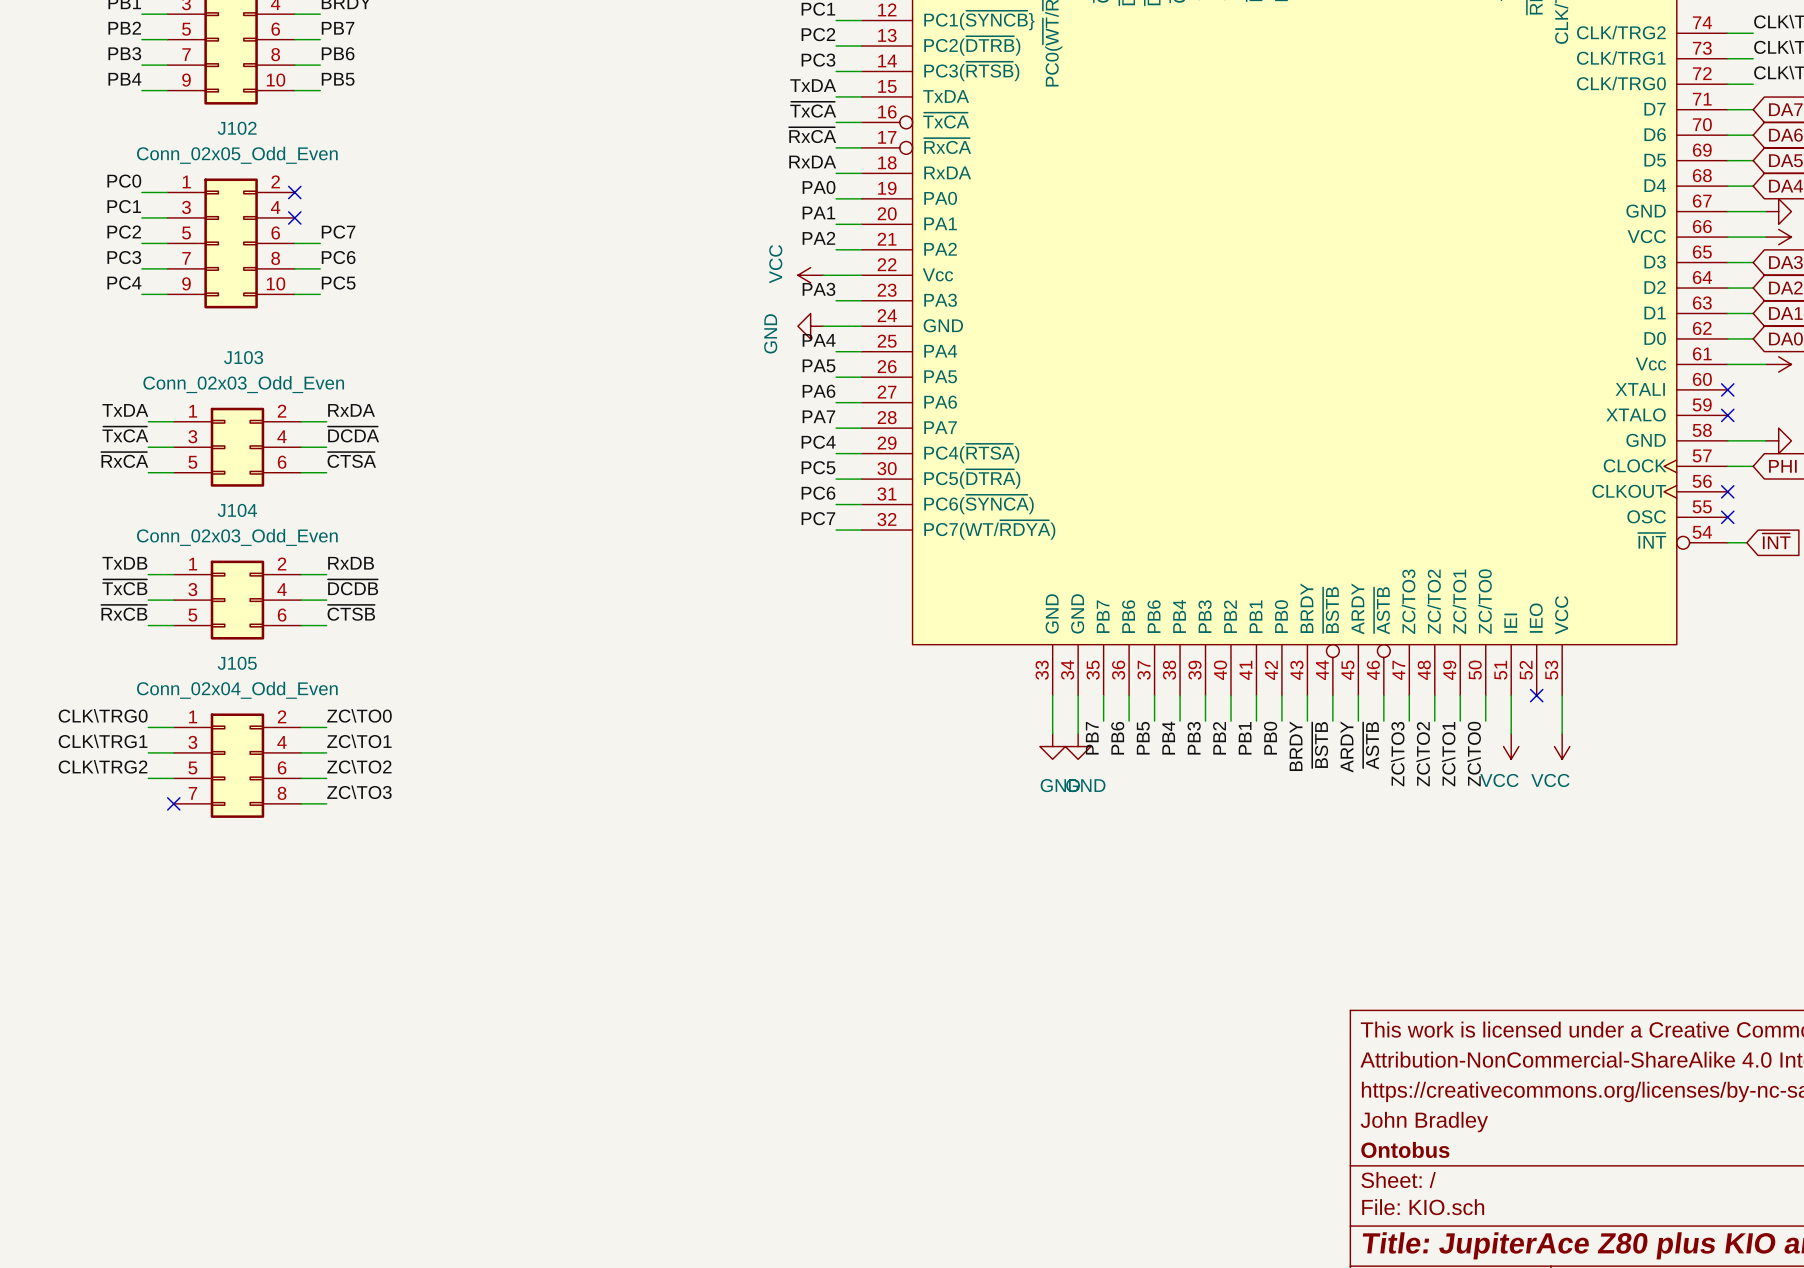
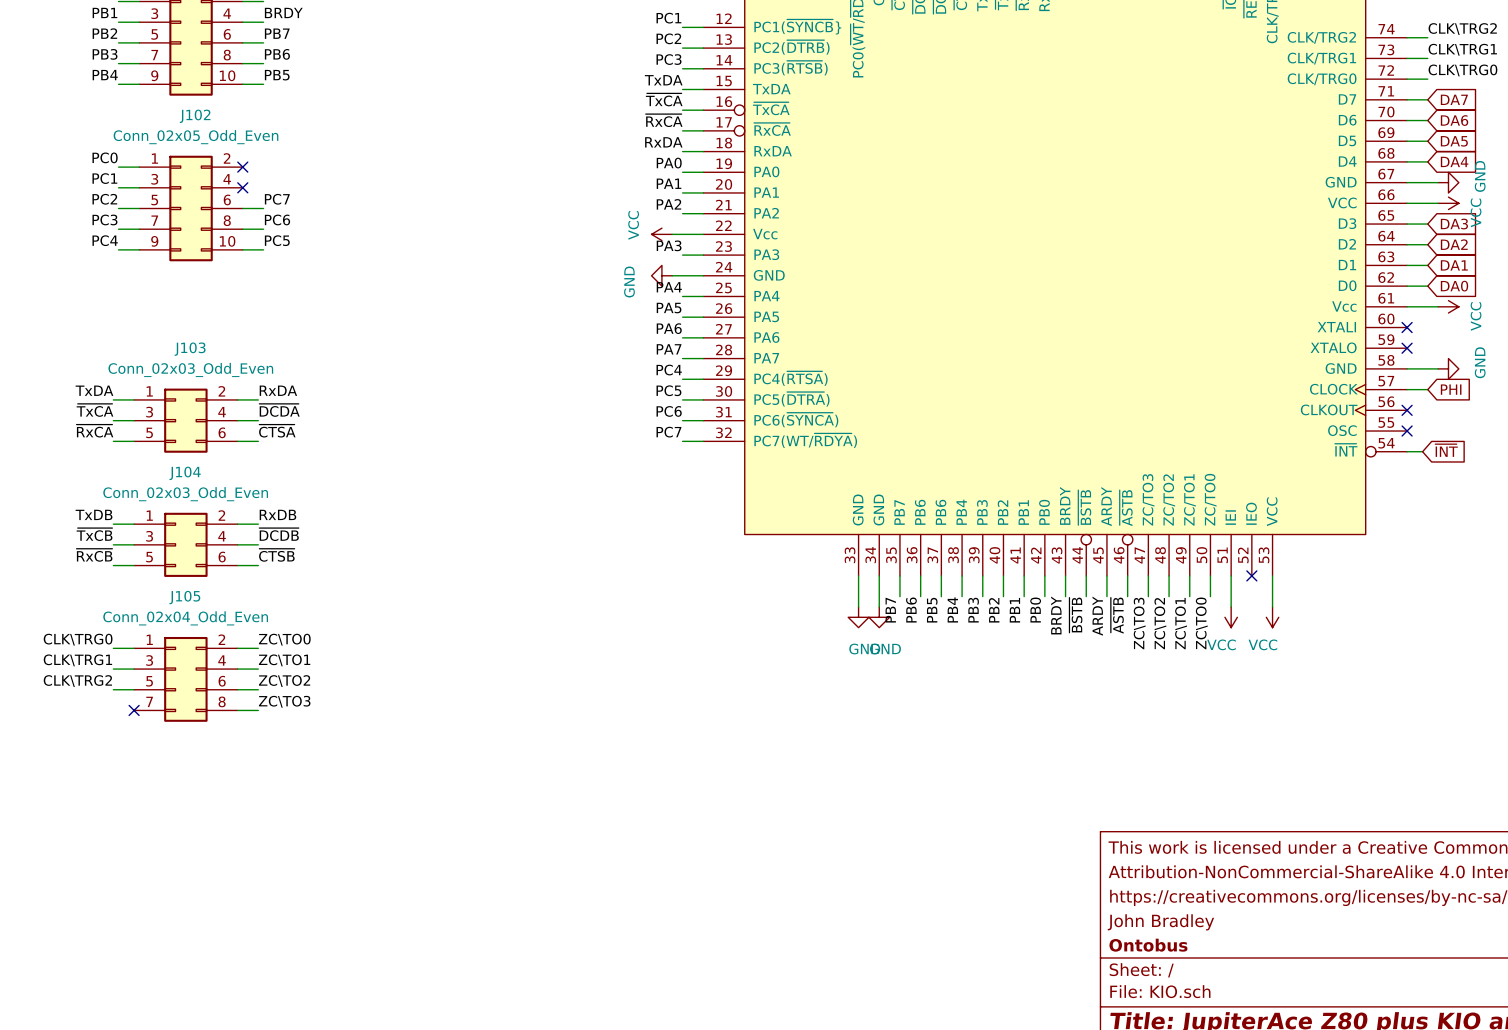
label position: TxDA (125, 410) -> TxDA (94, 390)
label position: RxDA (351, 410) -> RxDA (278, 390)
wire: (148, 421) (173, 421) -> (113, 399) (134, 399)
wire: (301, 421) (326, 421) -> (237, 399) (258, 399)
label position: ~{TxCA} (125, 434) -> ~{TxCA} (94, 410)
label position: ~{DCDA} (353, 434) -> ~{DCDA} (279, 410)
wire: (148, 447) (173, 447) -> (113, 420) (134, 420)
J103 position: (237, 447) -> (185, 420)
wire: (301, 447) (326, 447) -> (237, 420) (258, 420)
label position: ~{RxCA} (124, 459) -> ~{RxCA} (94, 431)
label position: ~{CTSA} (351, 459) -> ~{CTSA} (277, 431)
wire: (148, 472) (173, 472) -> (113, 441) (134, 441)
wire: (301, 472) (326, 472) -> (237, 441) (258, 441)
label position: TxDB (124, 563) -> TxDB (94, 514)
label position: RxDB (351, 563) -> RxDB (277, 514)
wire: (148, 574) (173, 574) -> (113, 524) (134, 524)
wire: (301, 574) (326, 574) -> (237, 524) (258, 524)
label position: ~{TxCB} (124, 587) -> ~{TxCB} (94, 534)
label position: ~{DCDB} (353, 587) -> ~{DCDB} (279, 534)
wire: (148, 600) (173, 600) -> (113, 544) (134, 544)
J104 position: (237, 600) -> (185, 544)
wire: (301, 600) (326, 600) -> (237, 544) (258, 544)
label position: ~{RxCB} (124, 612) -> ~{RxCB} (94, 555)
label position: ~{CTSB} (351, 612) -> ~{CTSB} (276, 555)
wire: (148, 625) (173, 625) -> (113, 565) (134, 565)
wire: (301, 625) (326, 625) -> (237, 565) (258, 565)
label position: CLK\TRG0 (103, 715) -> CLK\TRG0 (78, 639)
label position: ZC\TO0 (359, 715) -> ZC\TO0 (284, 639)
wire: (148, 727) (173, 727) -> (113, 648) (134, 648)
wire: (301, 727) (326, 727) -> (237, 648) (258, 648)
label position: CLK\TRG1 (103, 741) -> CLK\TRG1 (77, 660)
label position: ZC\TO1 (359, 741) -> ZC\TO1 (284, 660)
wire: (148, 752) (173, 752) -> (113, 669) (134, 669)
wire: (301, 752) (326, 752) -> (237, 669) (258, 669)
J105 position: (237, 765) -> (185, 679)
label position: CLK\TRG2 (103, 766) -> CLK\TRG2 (77, 681)
label position: ZC\TO2 (359, 766) -> ZC\TO2 (284, 681)
wire: (148, 778) (173, 778) -> (113, 689) (134, 689)
wire: (301, 778) (326, 778) -> (237, 689) (258, 689)
label position: ZC\TO3 (359, 792) -> ZC\TO3 (284, 701)
no-connect mark position: (173, 803) -> (134, 710)
wire: (301, 803) (326, 803) -> (237, 710) (258, 710)

